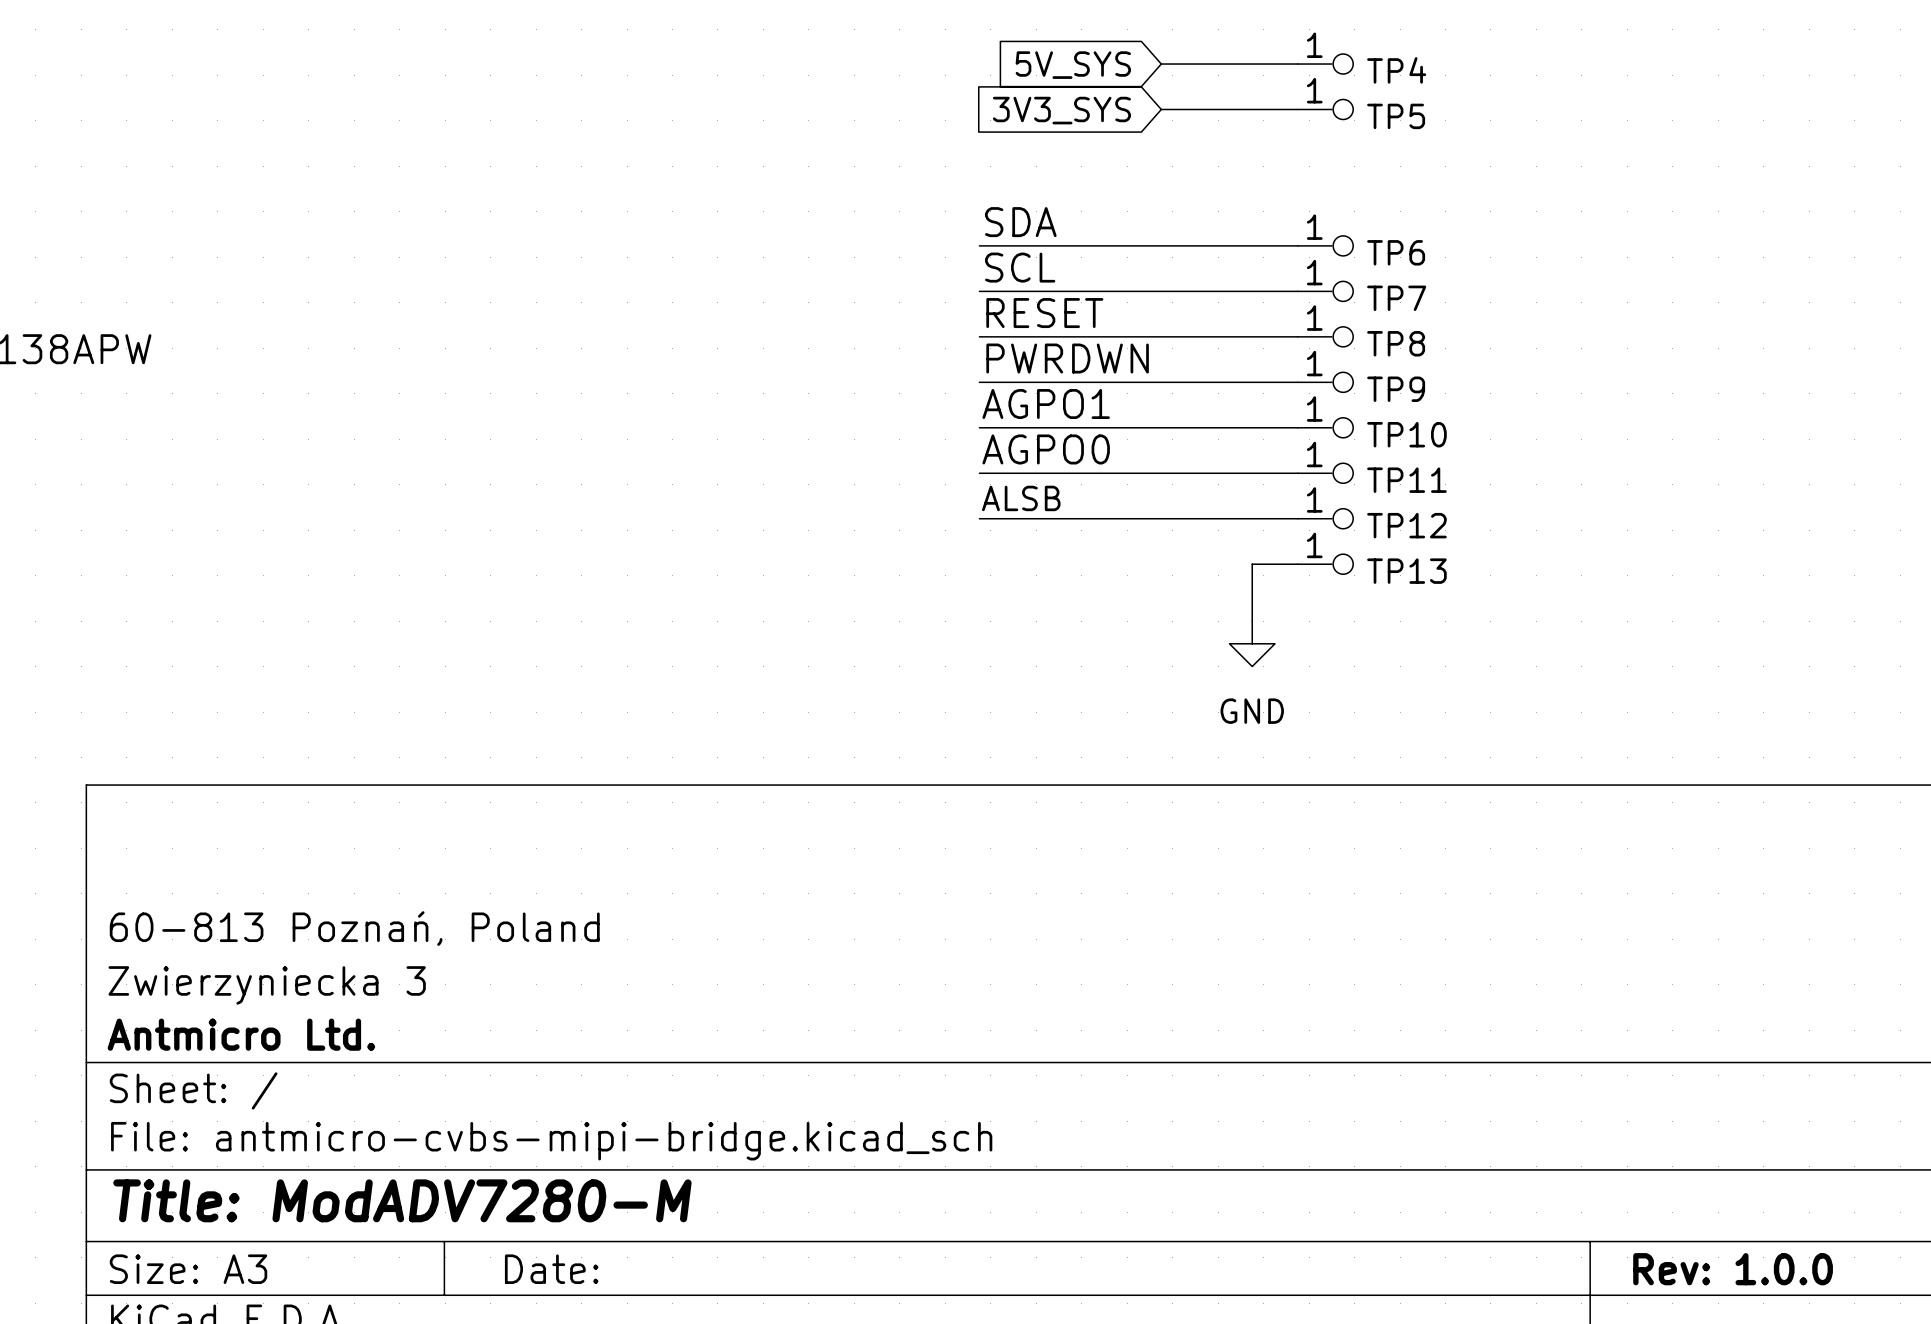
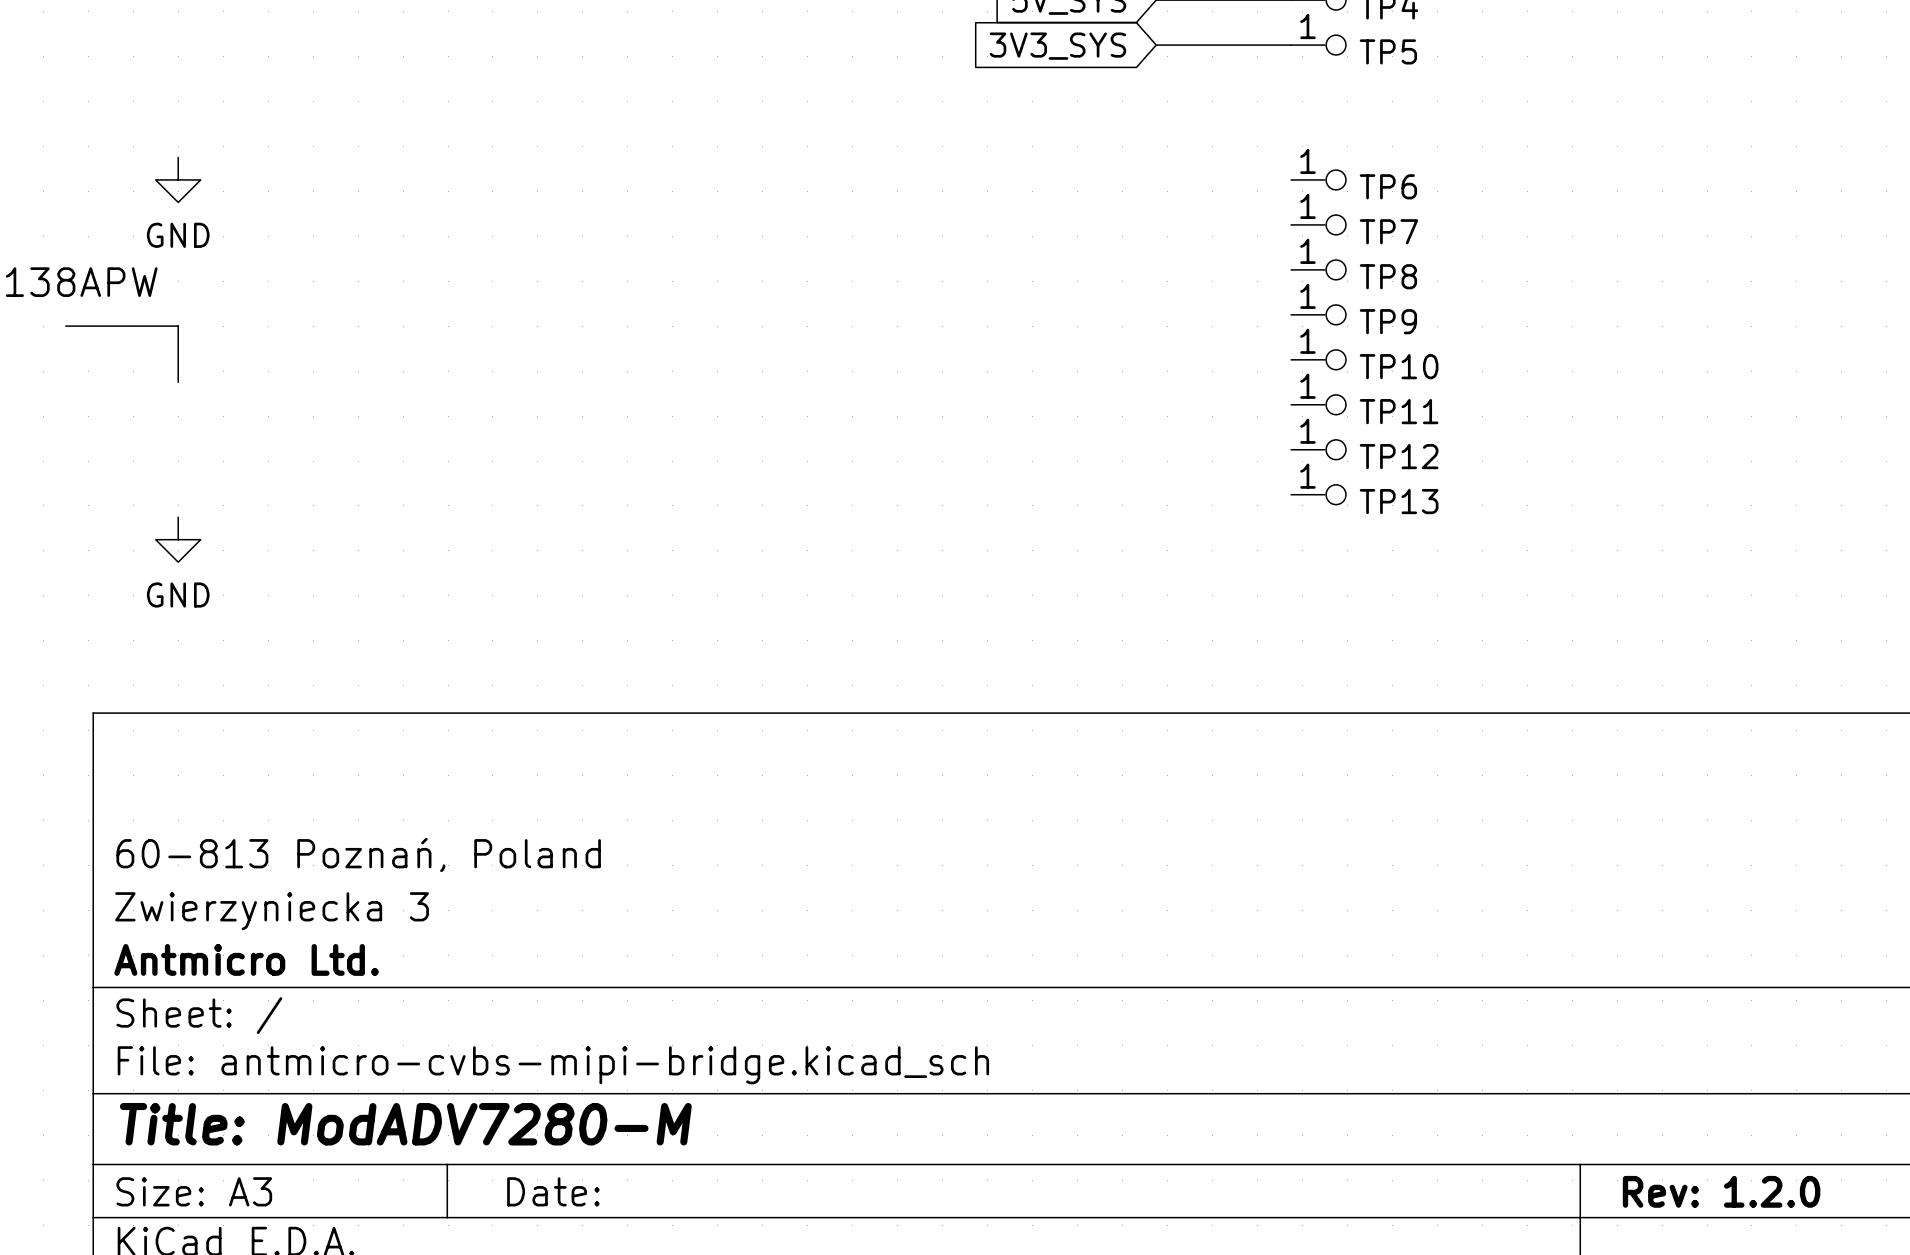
label: SDA (1020, 222) -> none
power symbol: none -> GND (178, 179)
wire: (979, 245) (1297, 245) -> none
label: SCL (1020, 267) -> none
wire: (979, 291) (1297, 291) -> none
label: RESET (1044, 313) -> none
wire: (979, 336) (1297, 336) -> none
label: PWRDWN (1067, 358) -> none
wire: (979, 382) (1297, 382) -> none
wire: none -> (65, 326) (178, 326) (178, 382)
label: AGPO1 (1046, 403) -> none
wire: (979, 427) (1297, 427) -> none
label: AGPO0 (1046, 449) -> none
wire: (979, 473) (1297, 473) -> none
label: ALSB (1021, 498) -> none
wire: (979, 518) (1297, 518) -> none
wire: (1297, 564) (1252, 564) (1252, 621) -> none
power symbol: none -> GND (178, 539)
power symbol: GND (1252, 643) -> none
title block: Rev: 1.0.0 (1733, 1269) -> Rev: 1.2.0 (1721, 1191)

